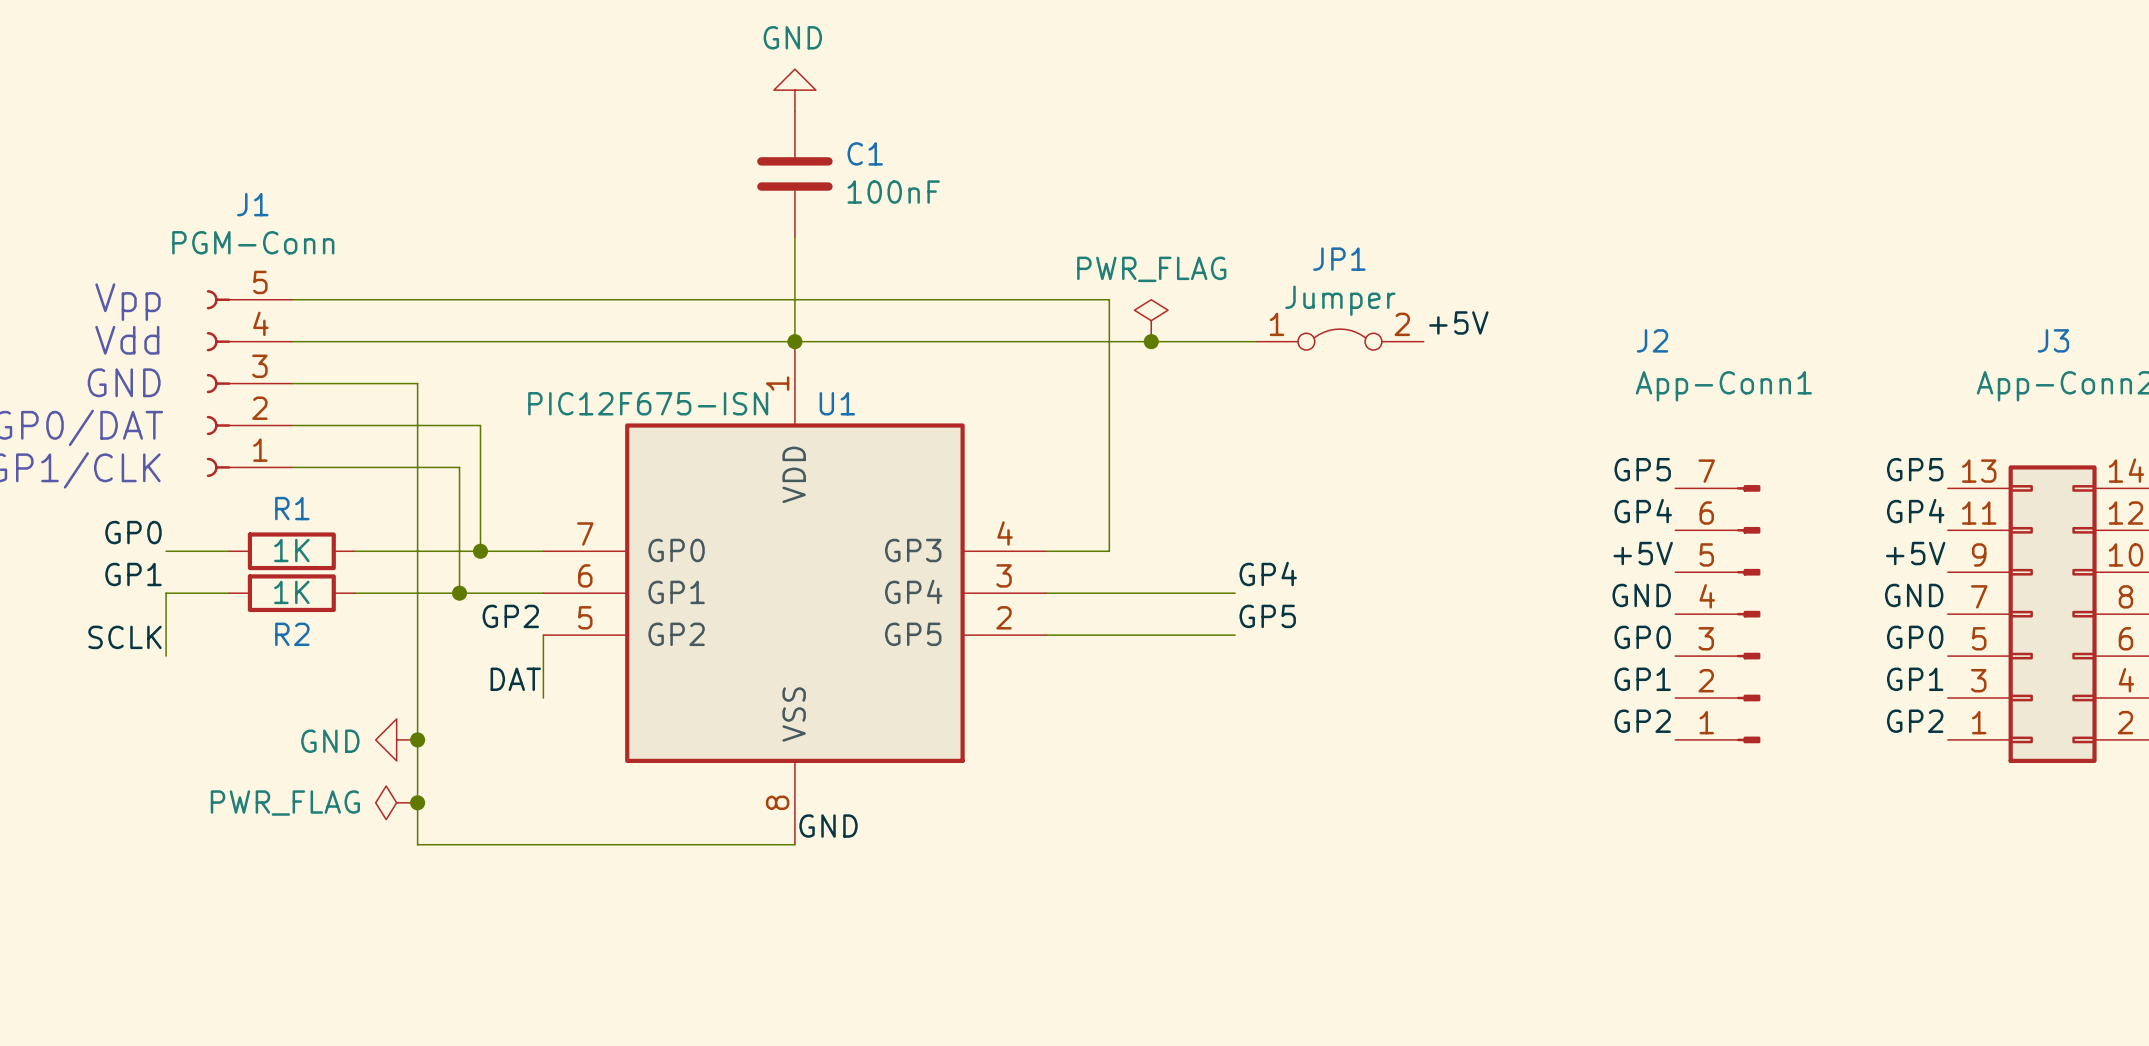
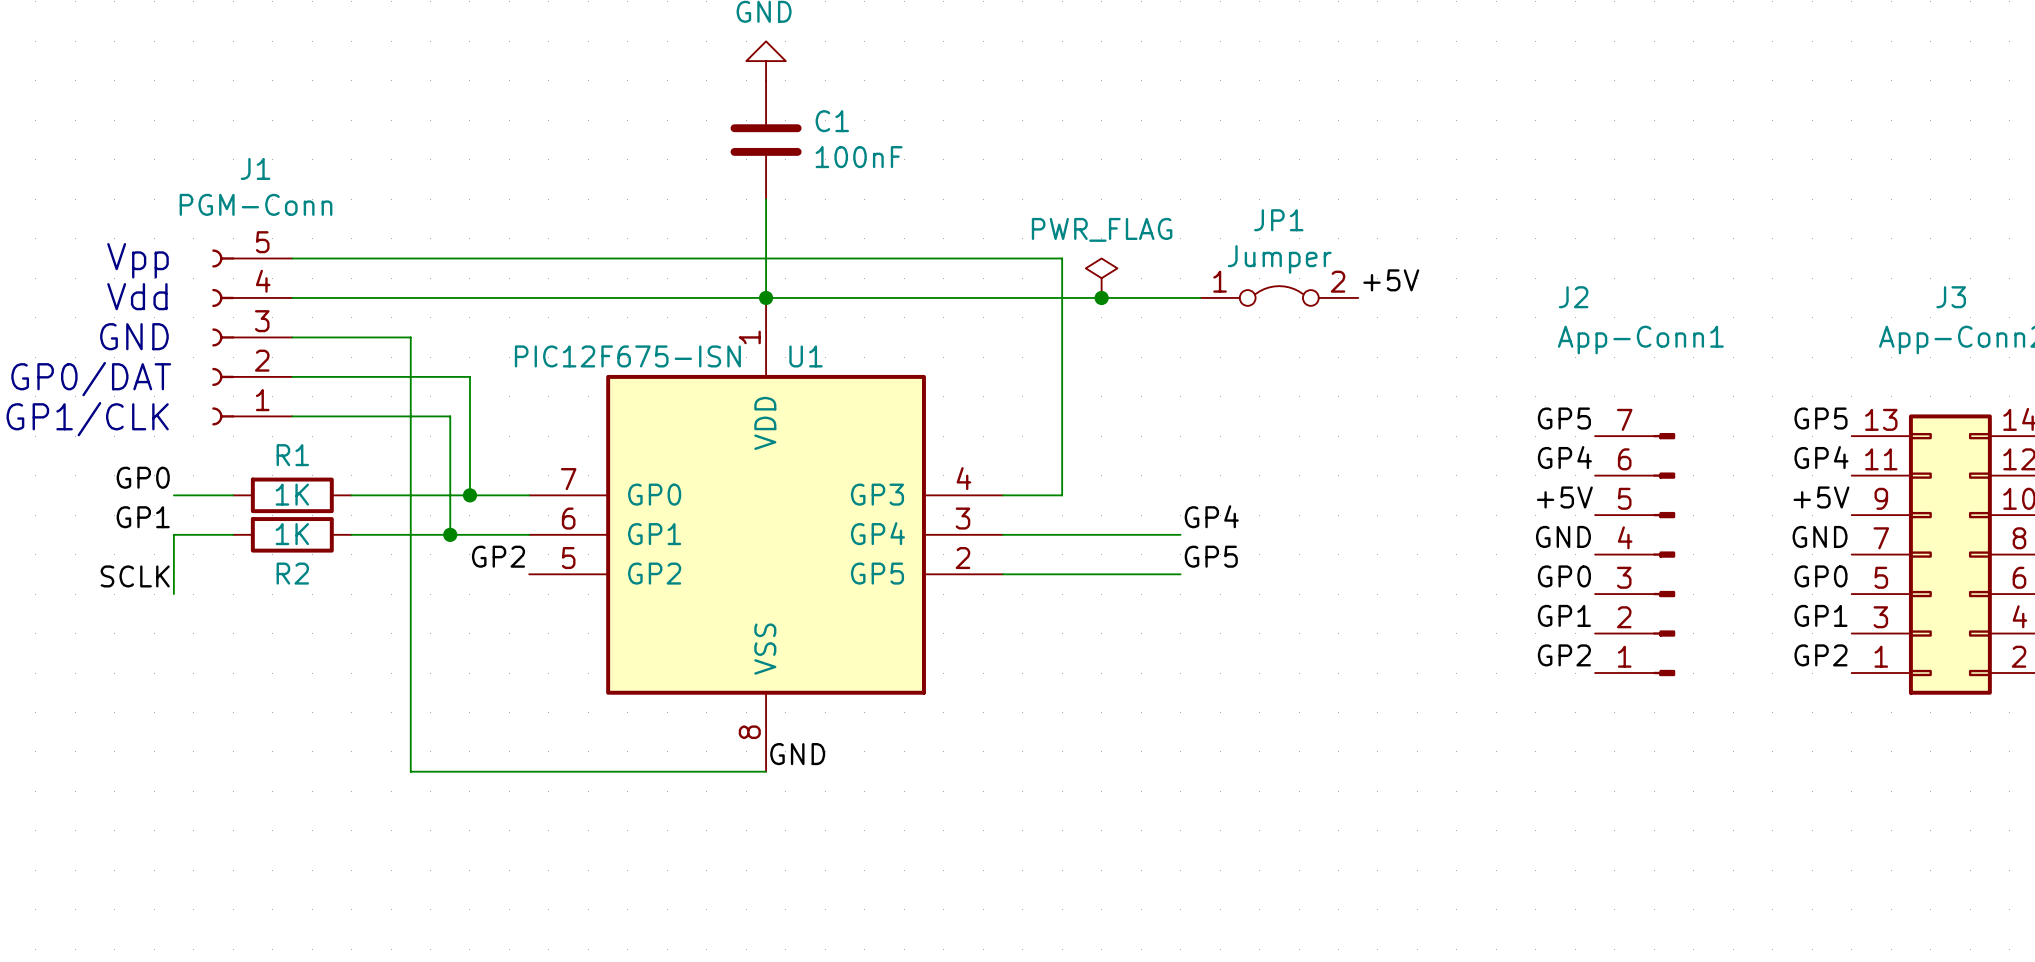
wire: (543, 635) (543, 698) -> none
label: DAT (515, 679) -> none
power symbol: GND (396, 739) -> none
junction: (417, 739) -> none
power symbol: PWR_FLAG (396, 802) -> none
junction: (417, 802) -> none

